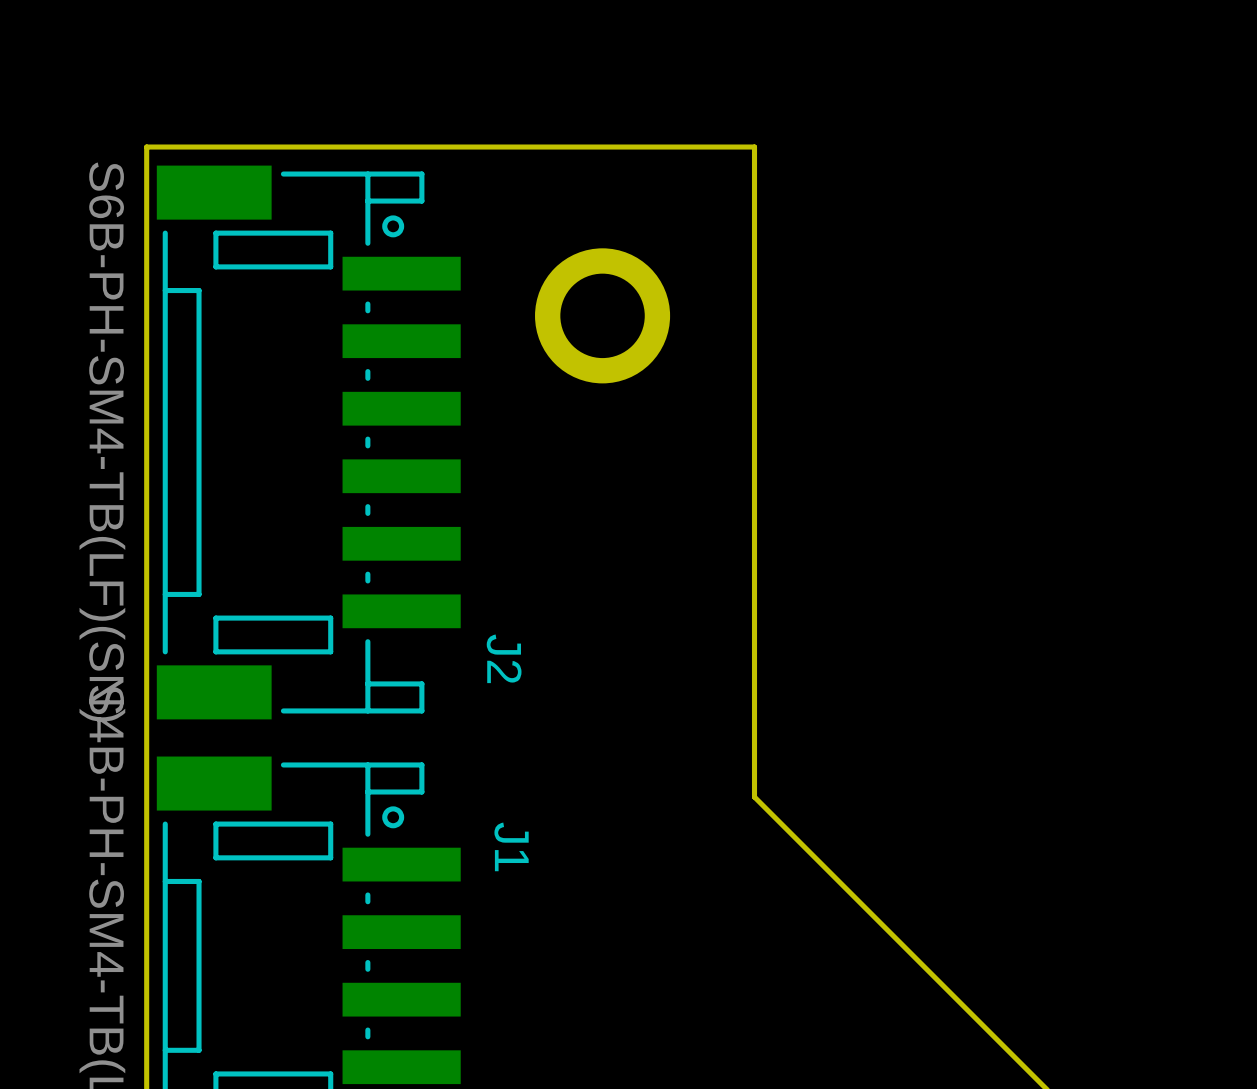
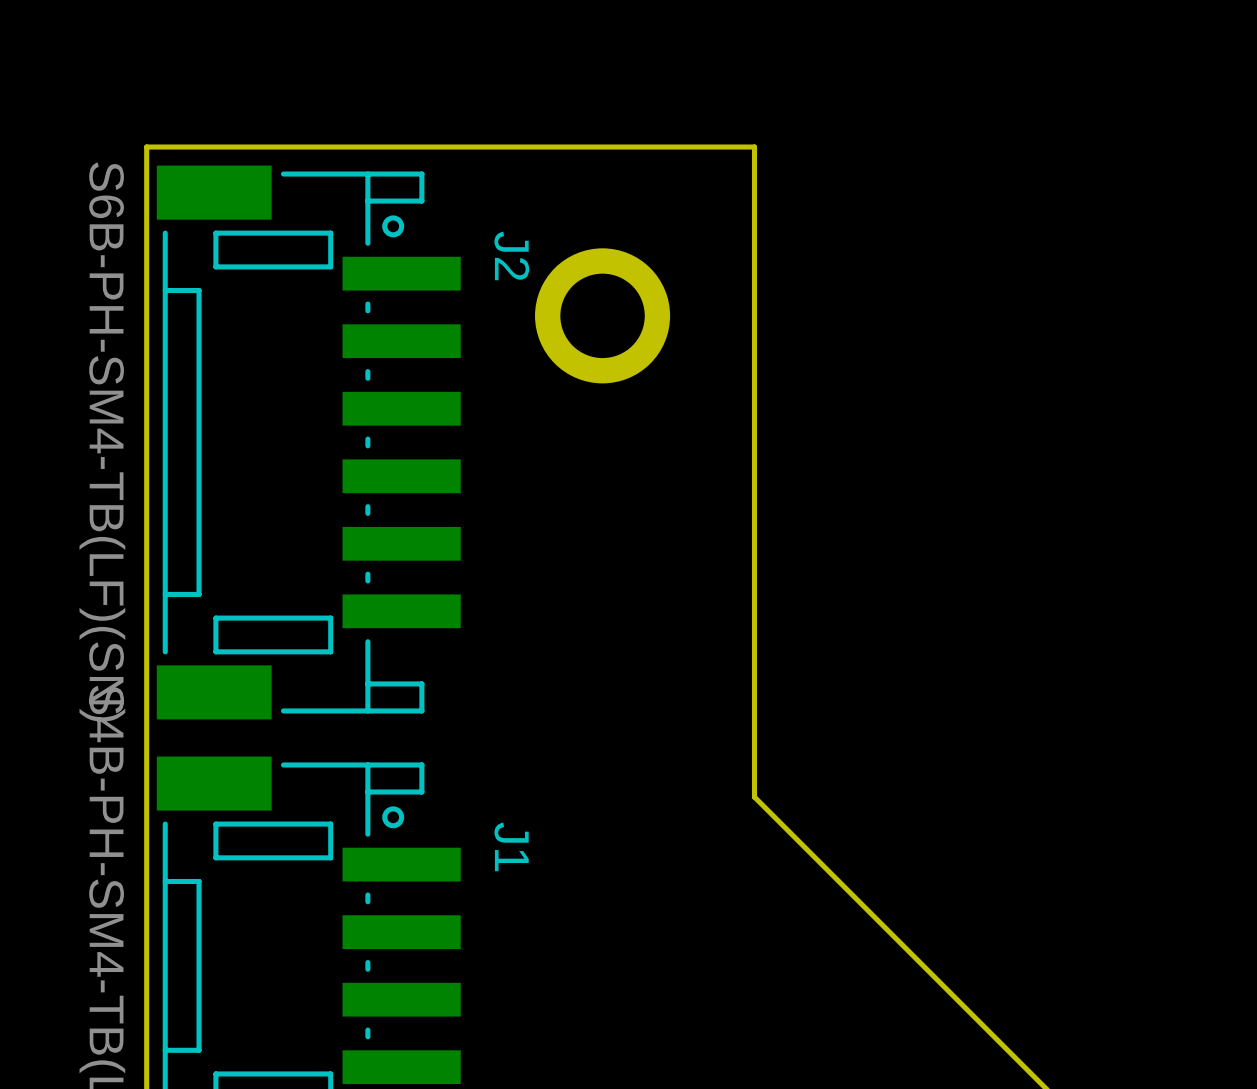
J2 name position: J2 (504, 658) -> J2 (511, 255)

